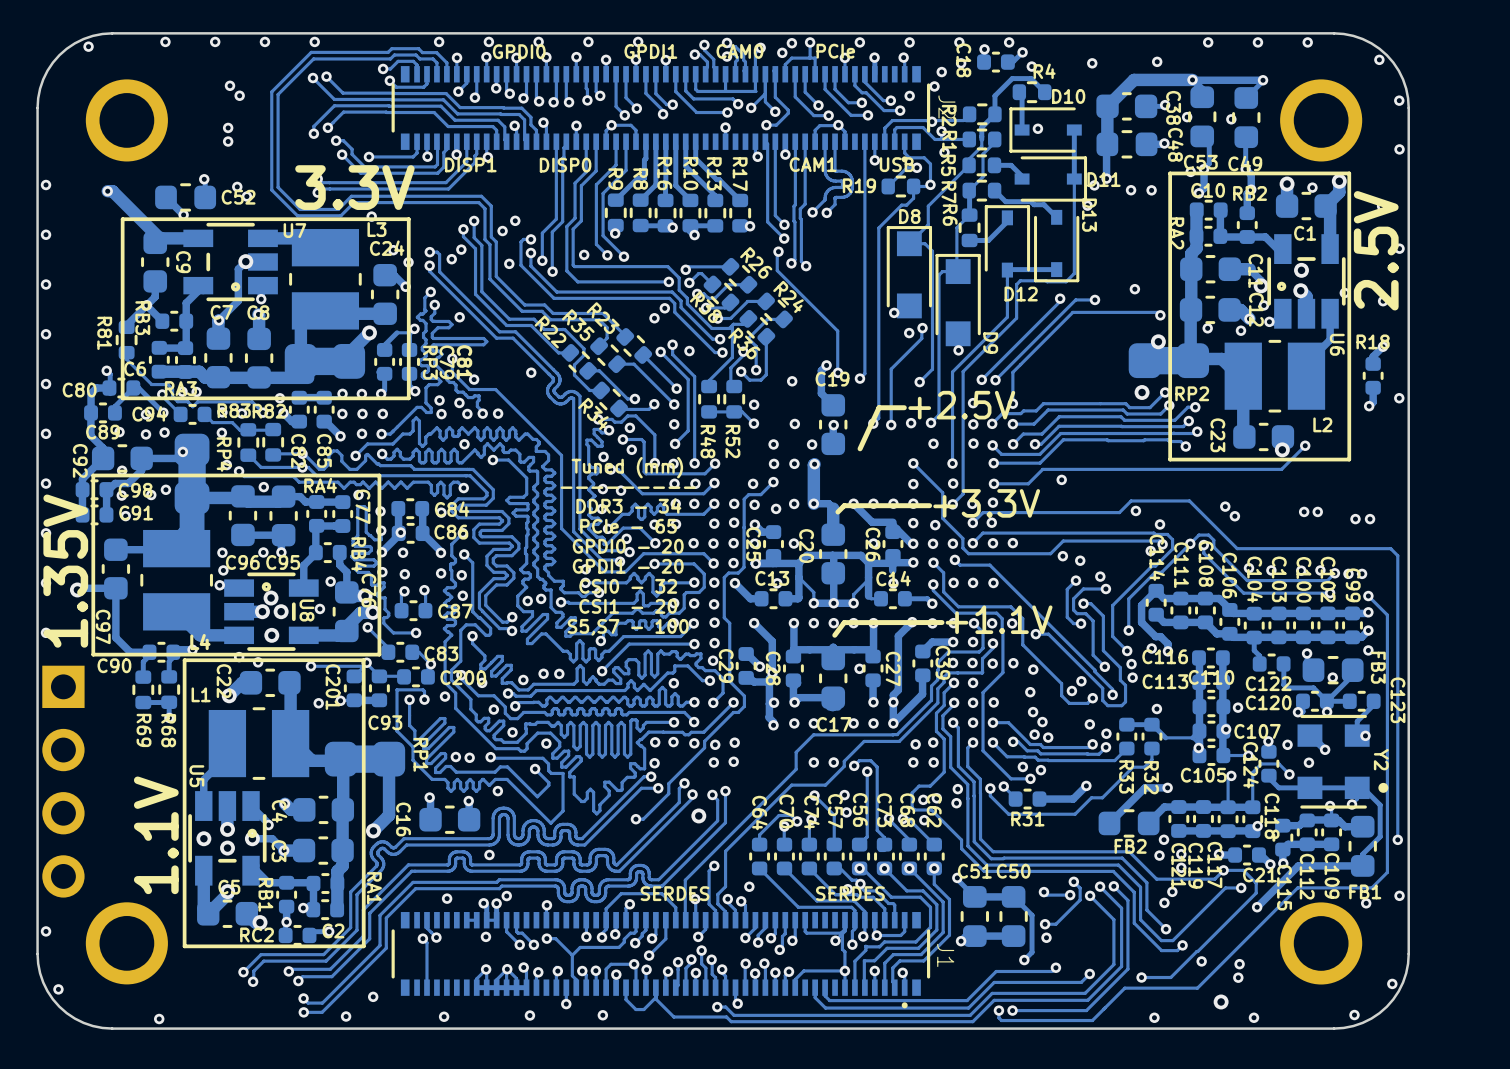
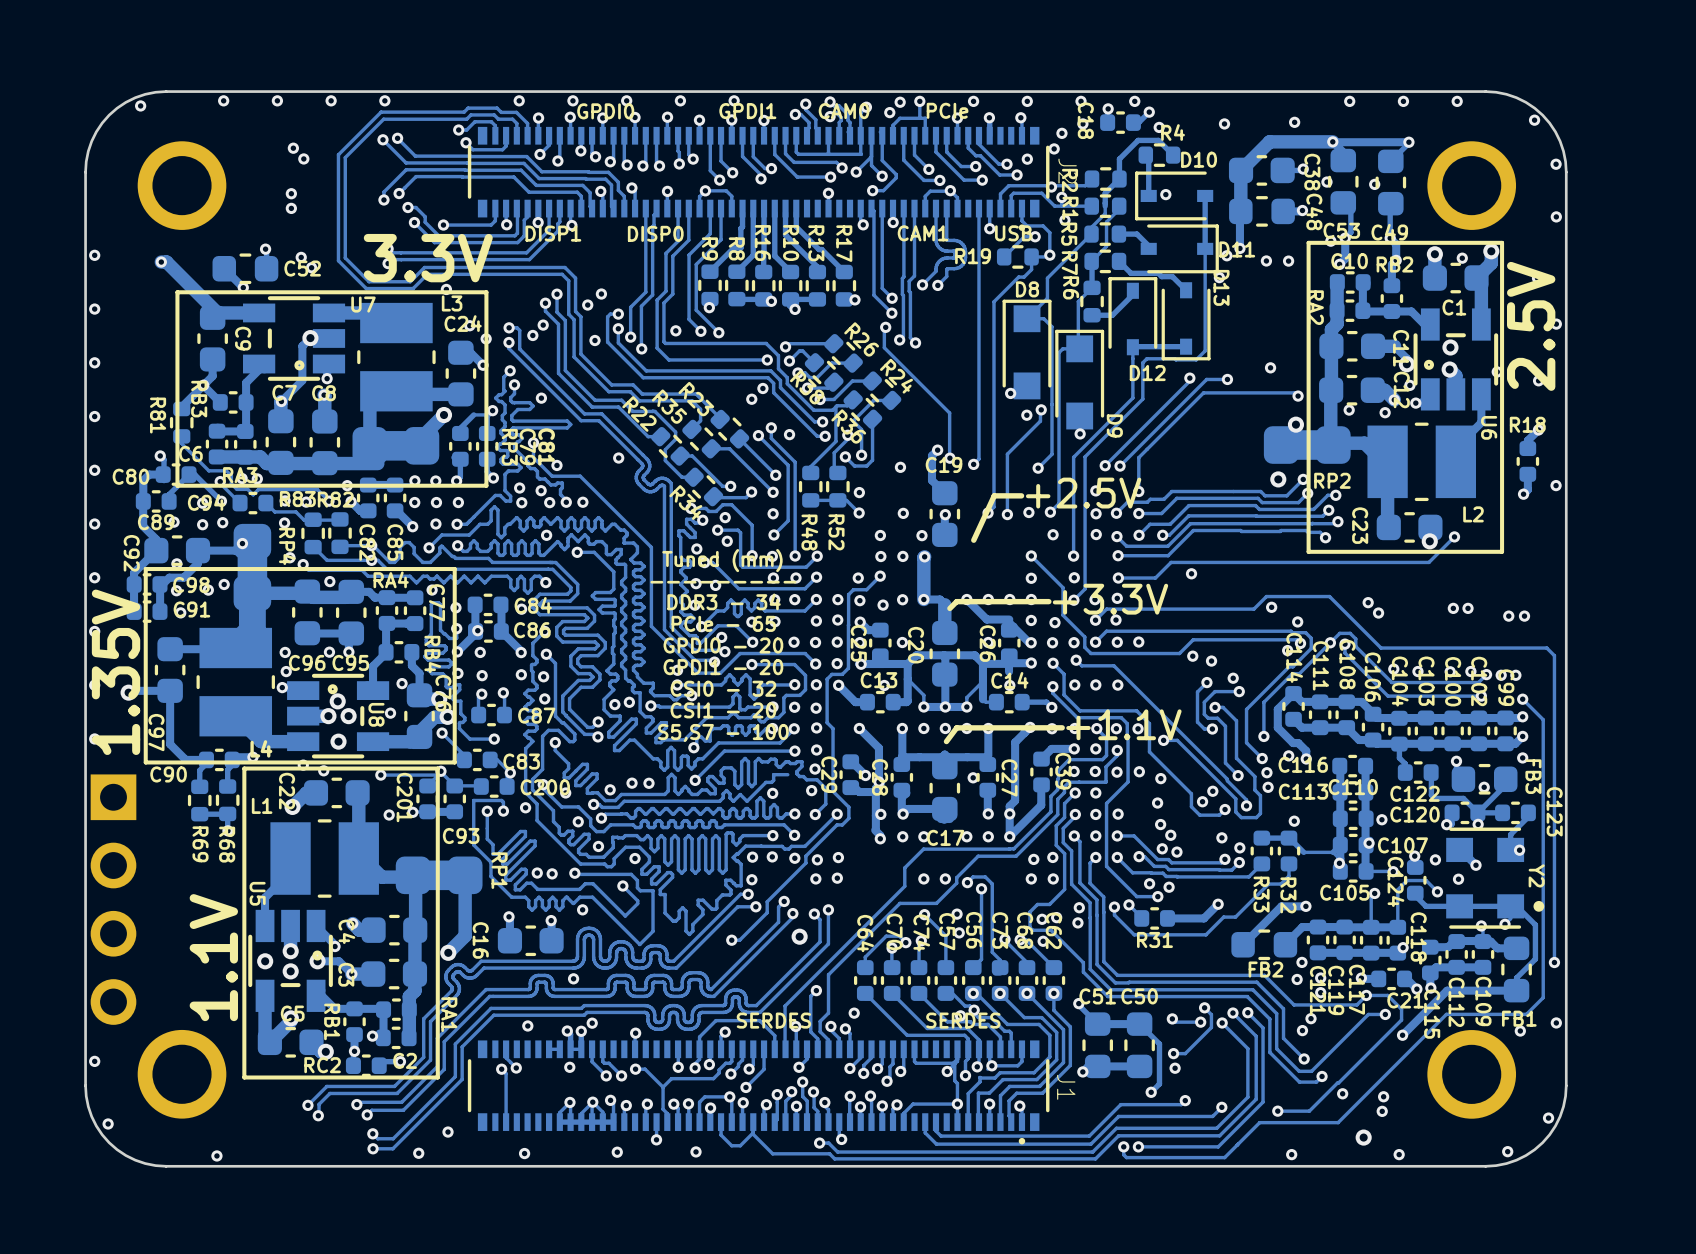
track: (687, 665) (702, 680) (709, 680) -> none

